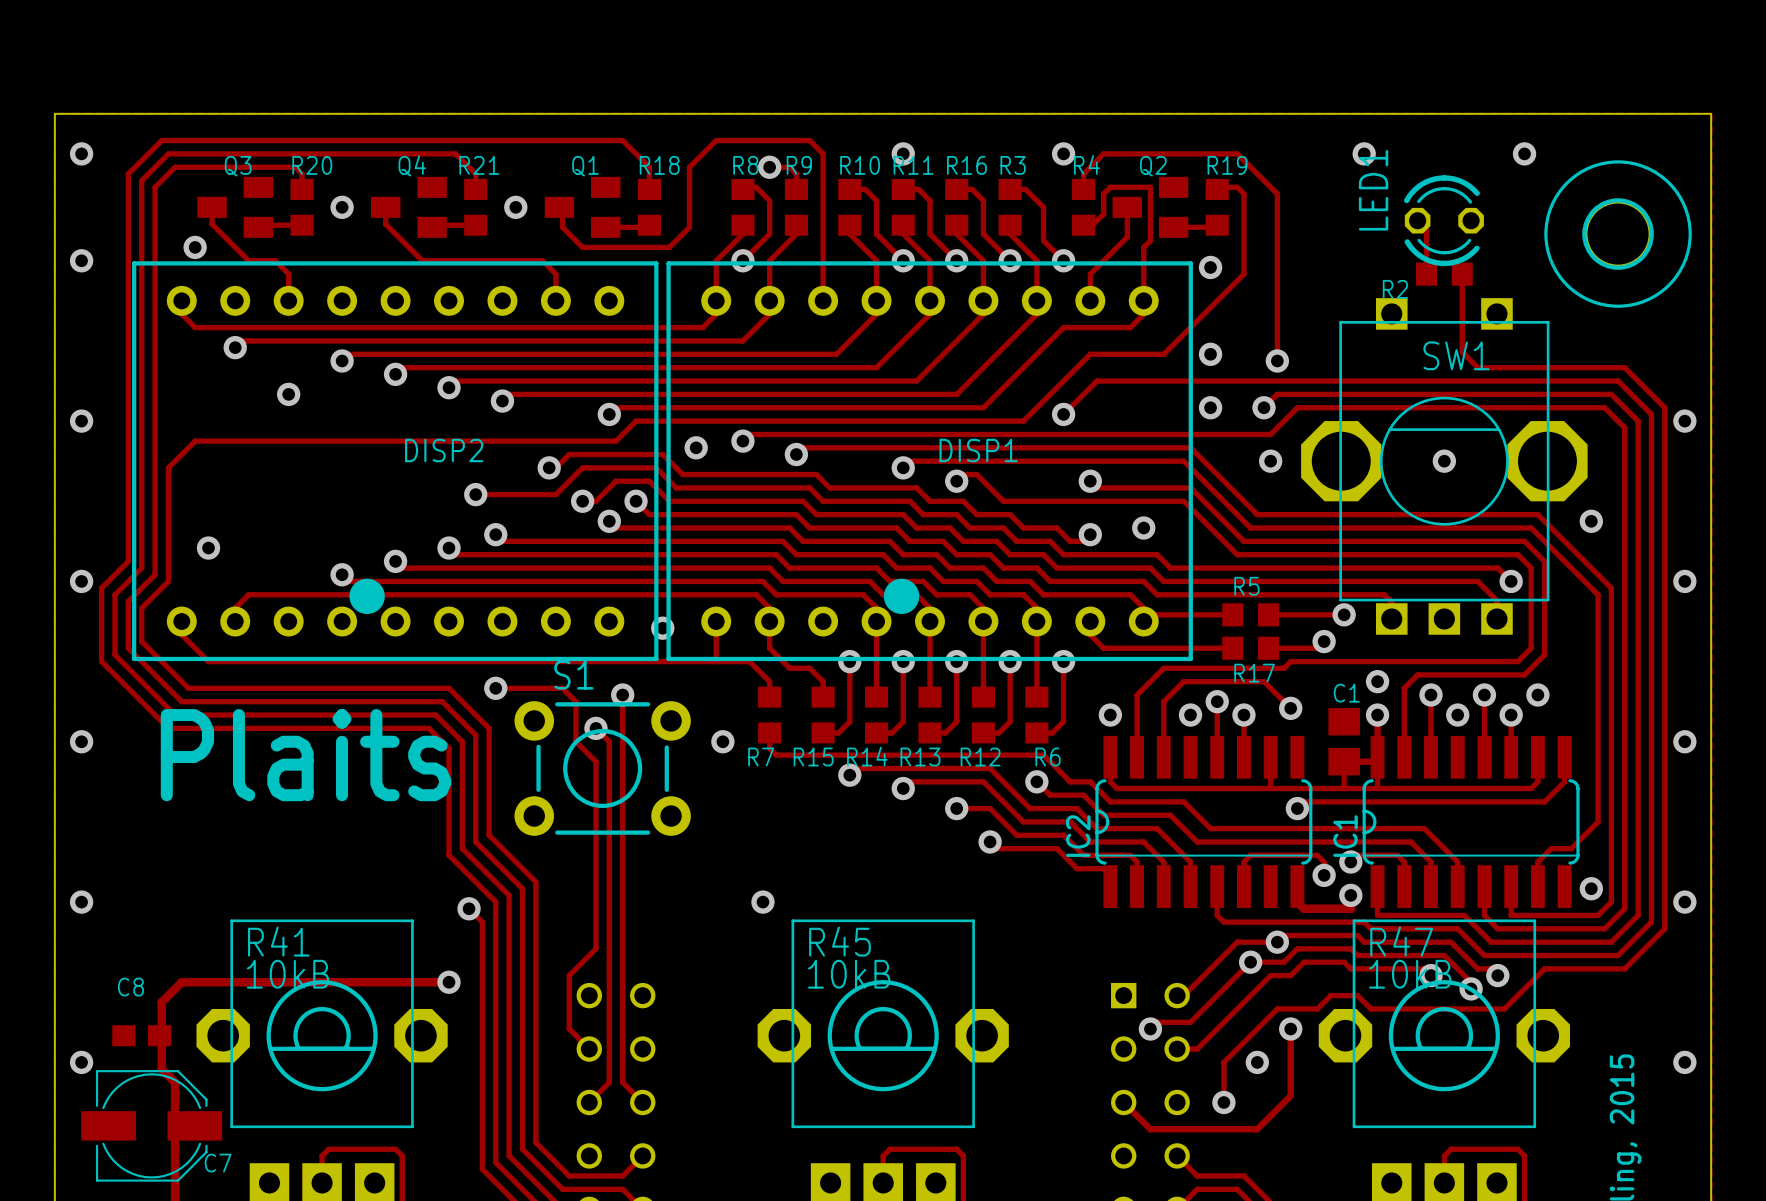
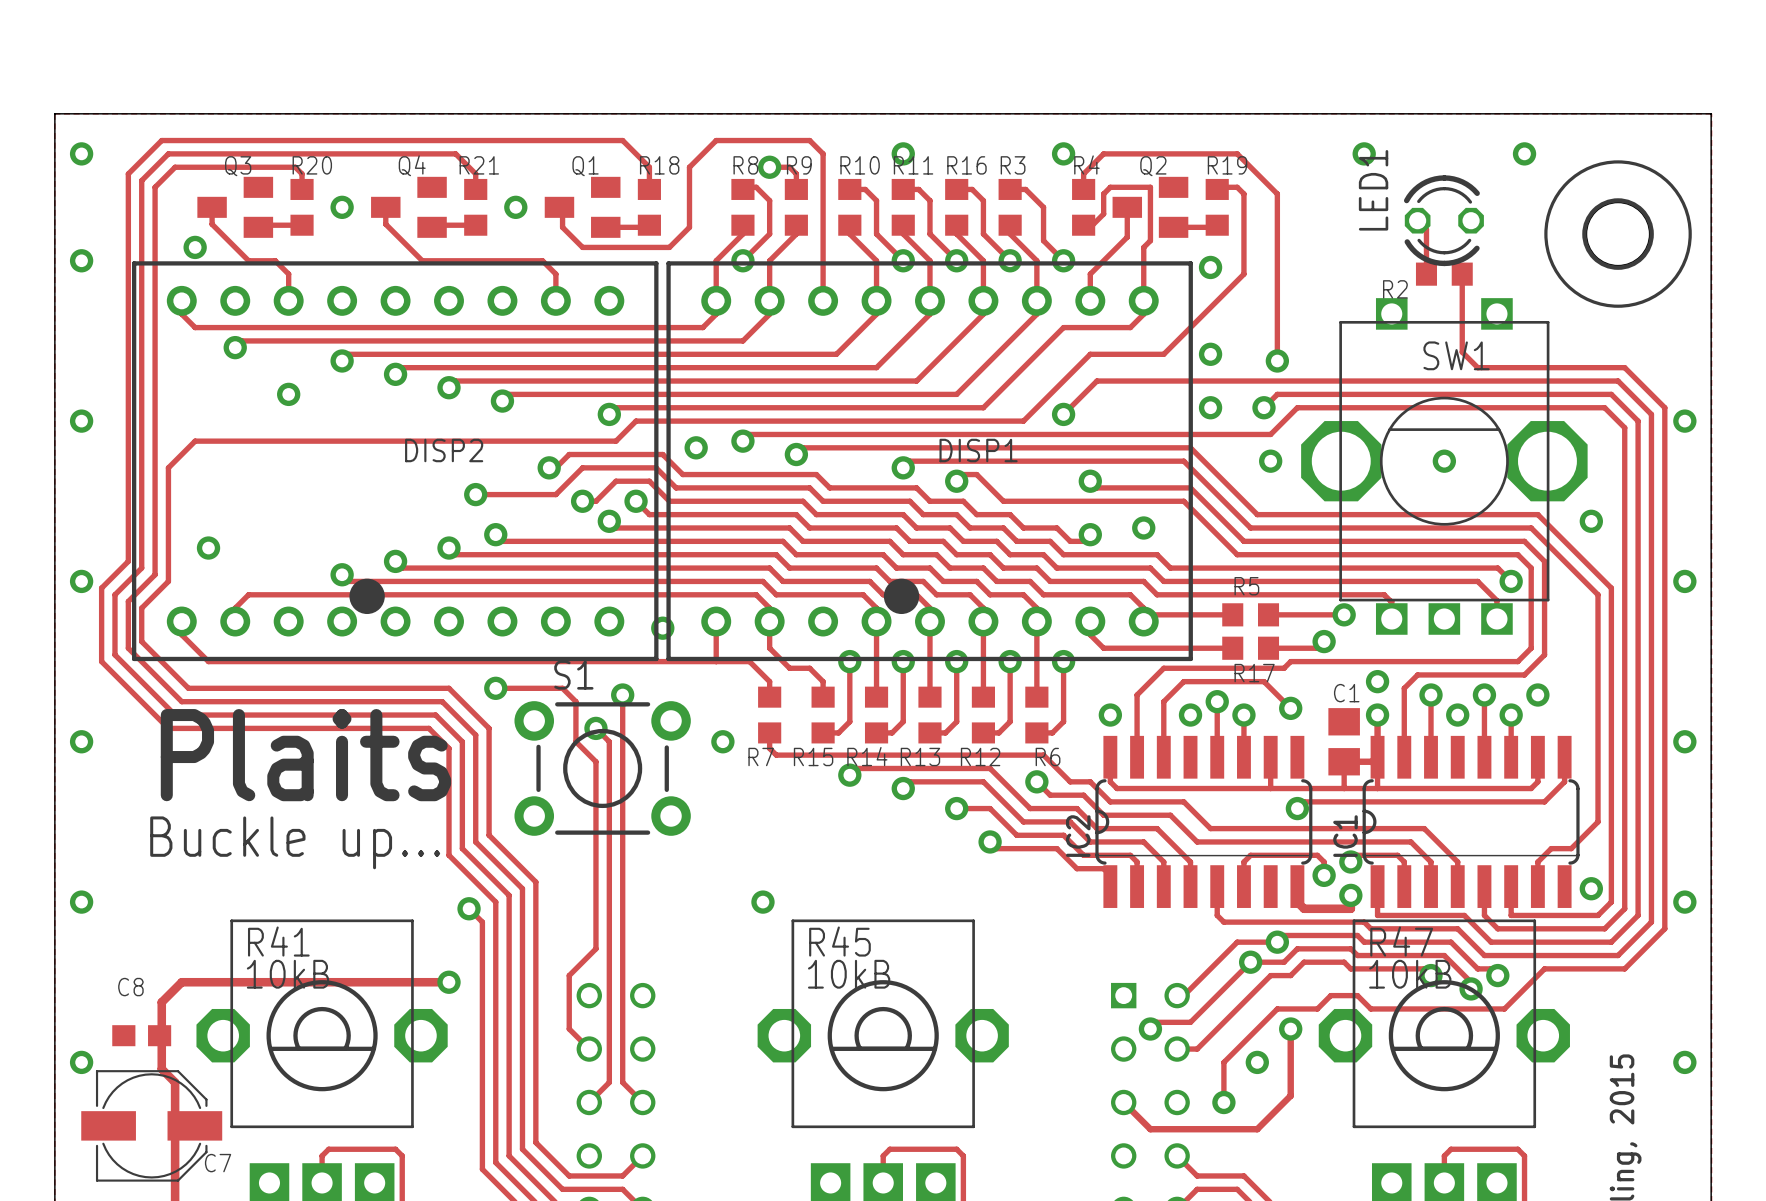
text: none -> Buckle up... (295, 842)

